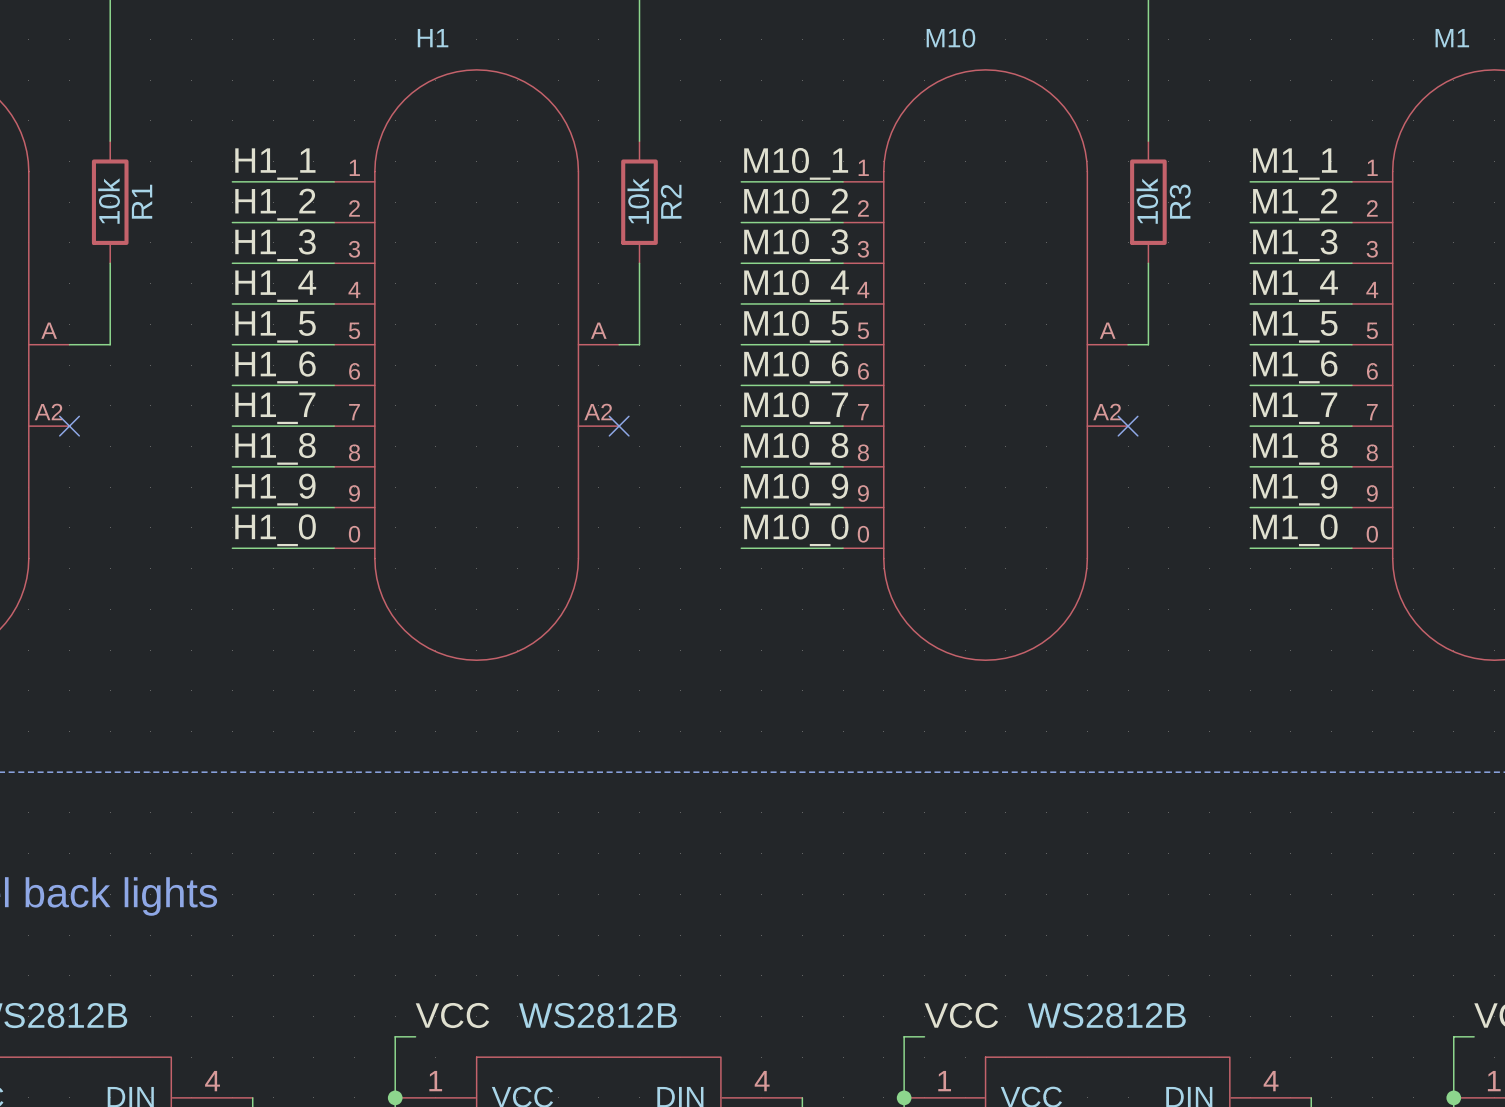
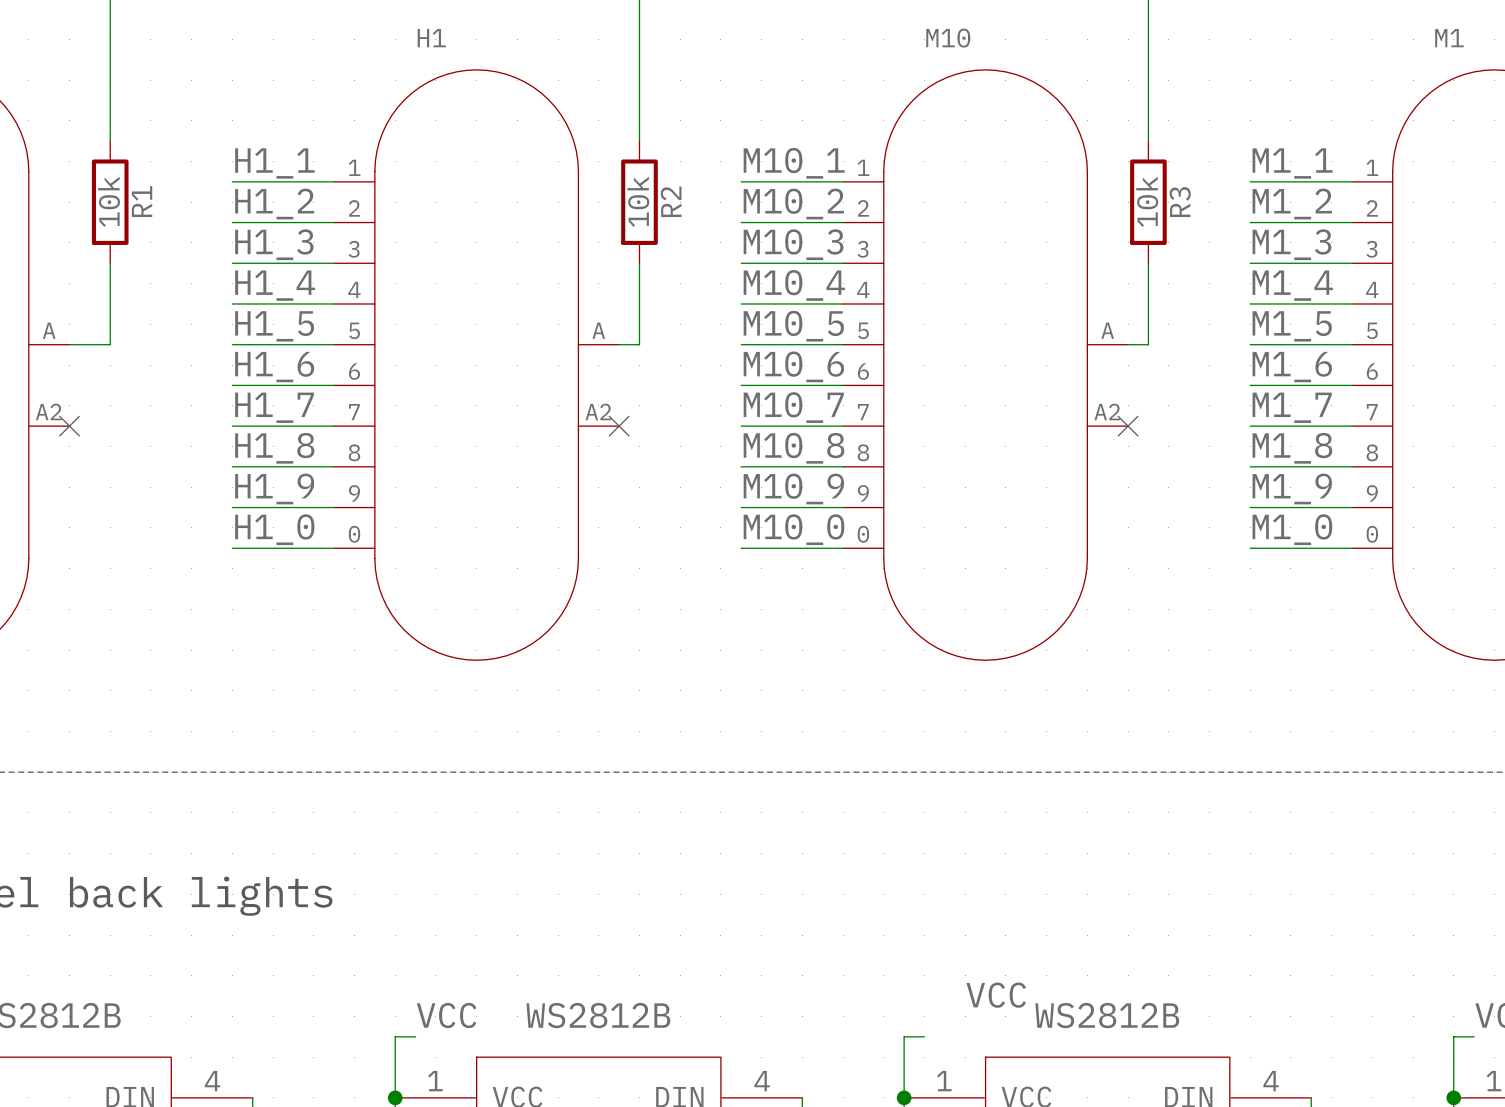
label position: VCC (961, 1015) -> VCC (996, 995)

